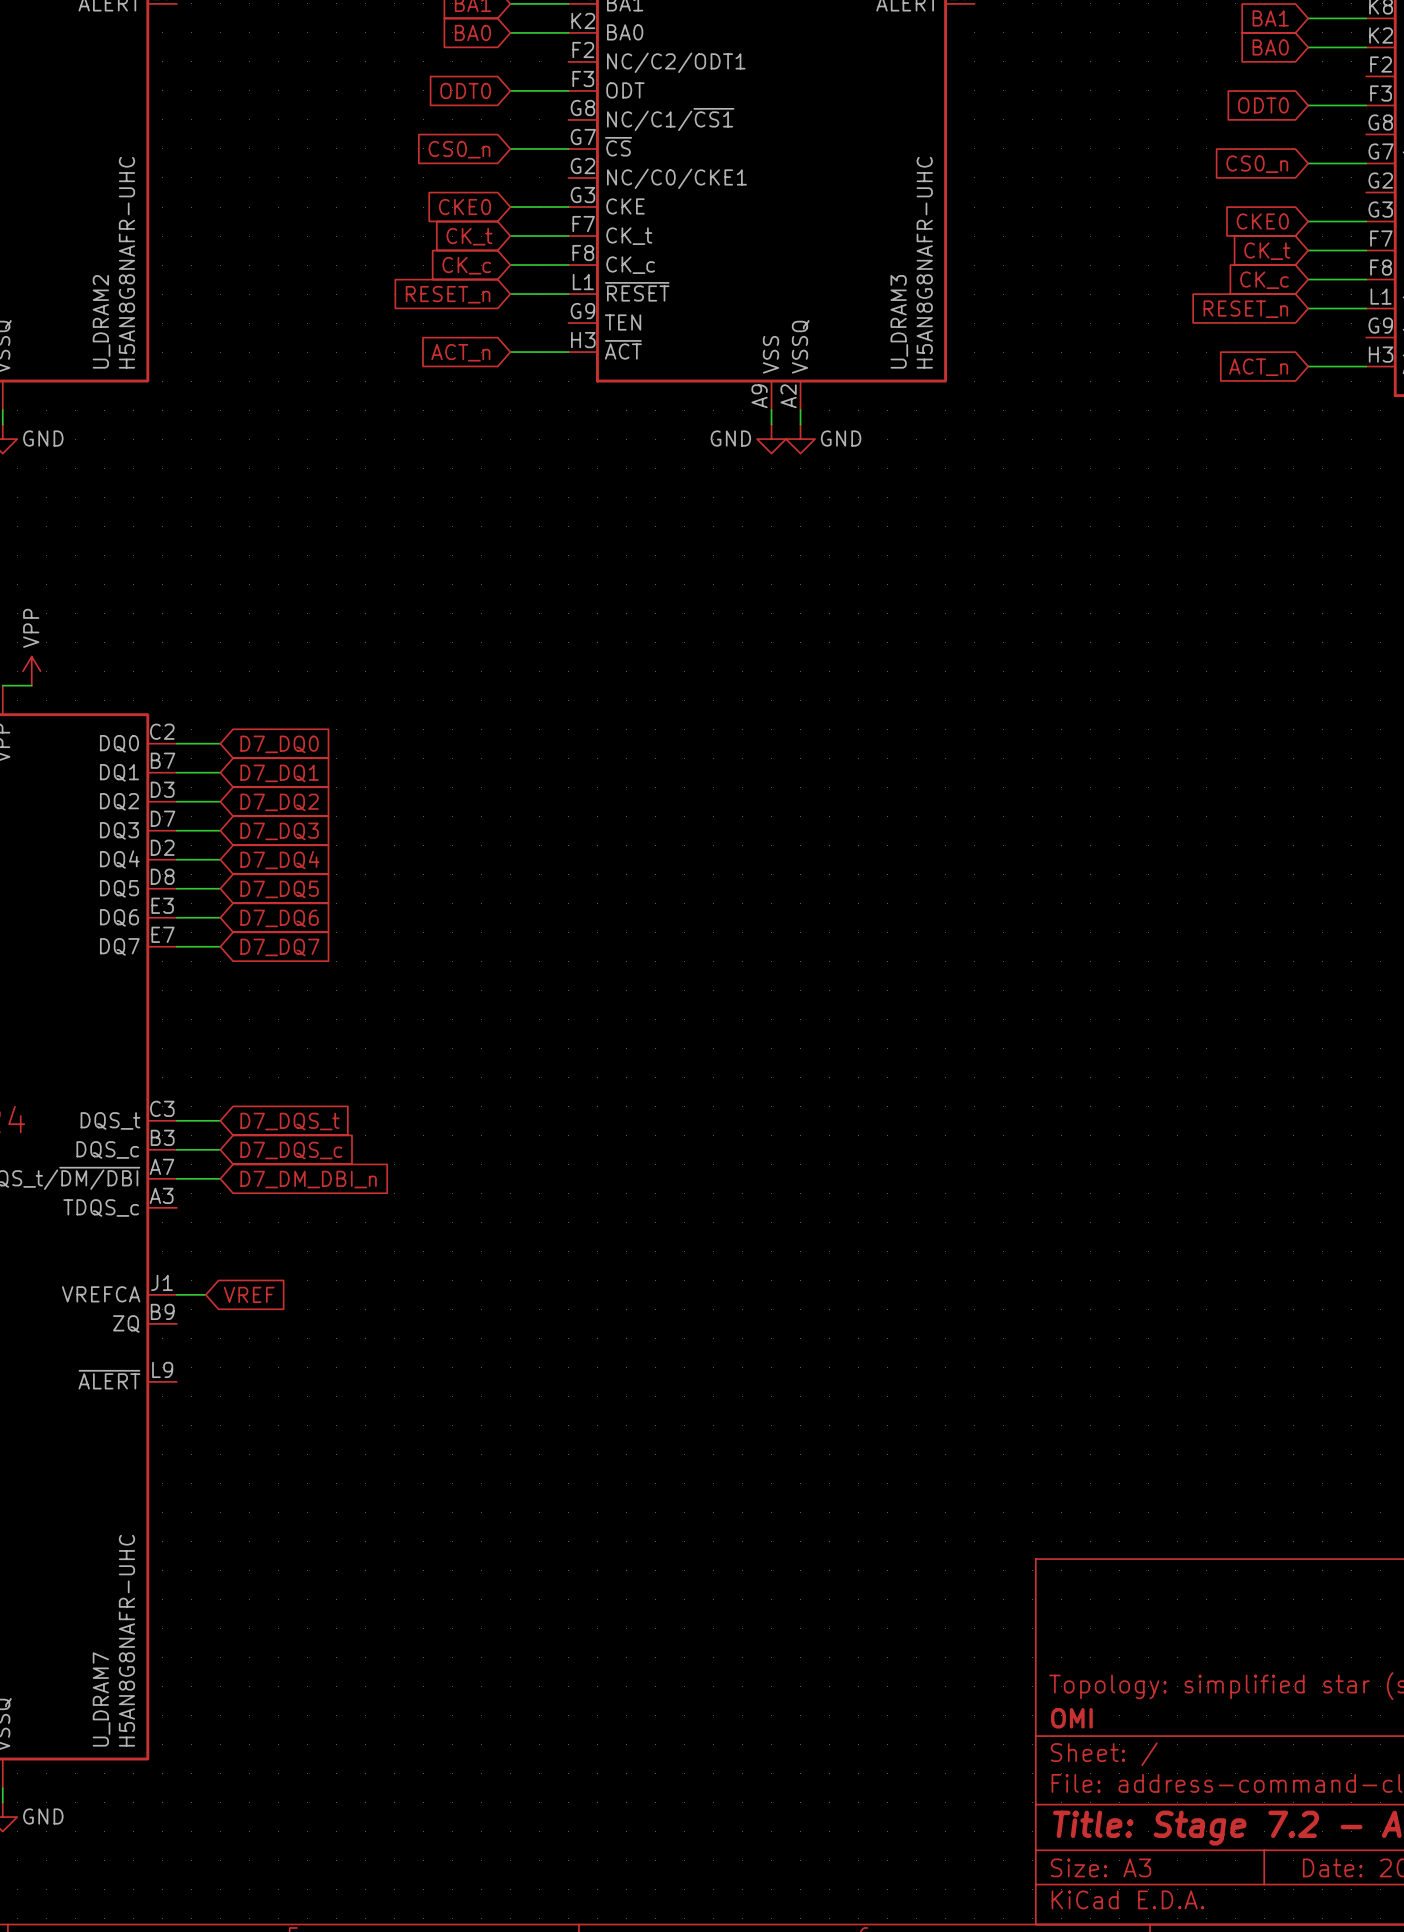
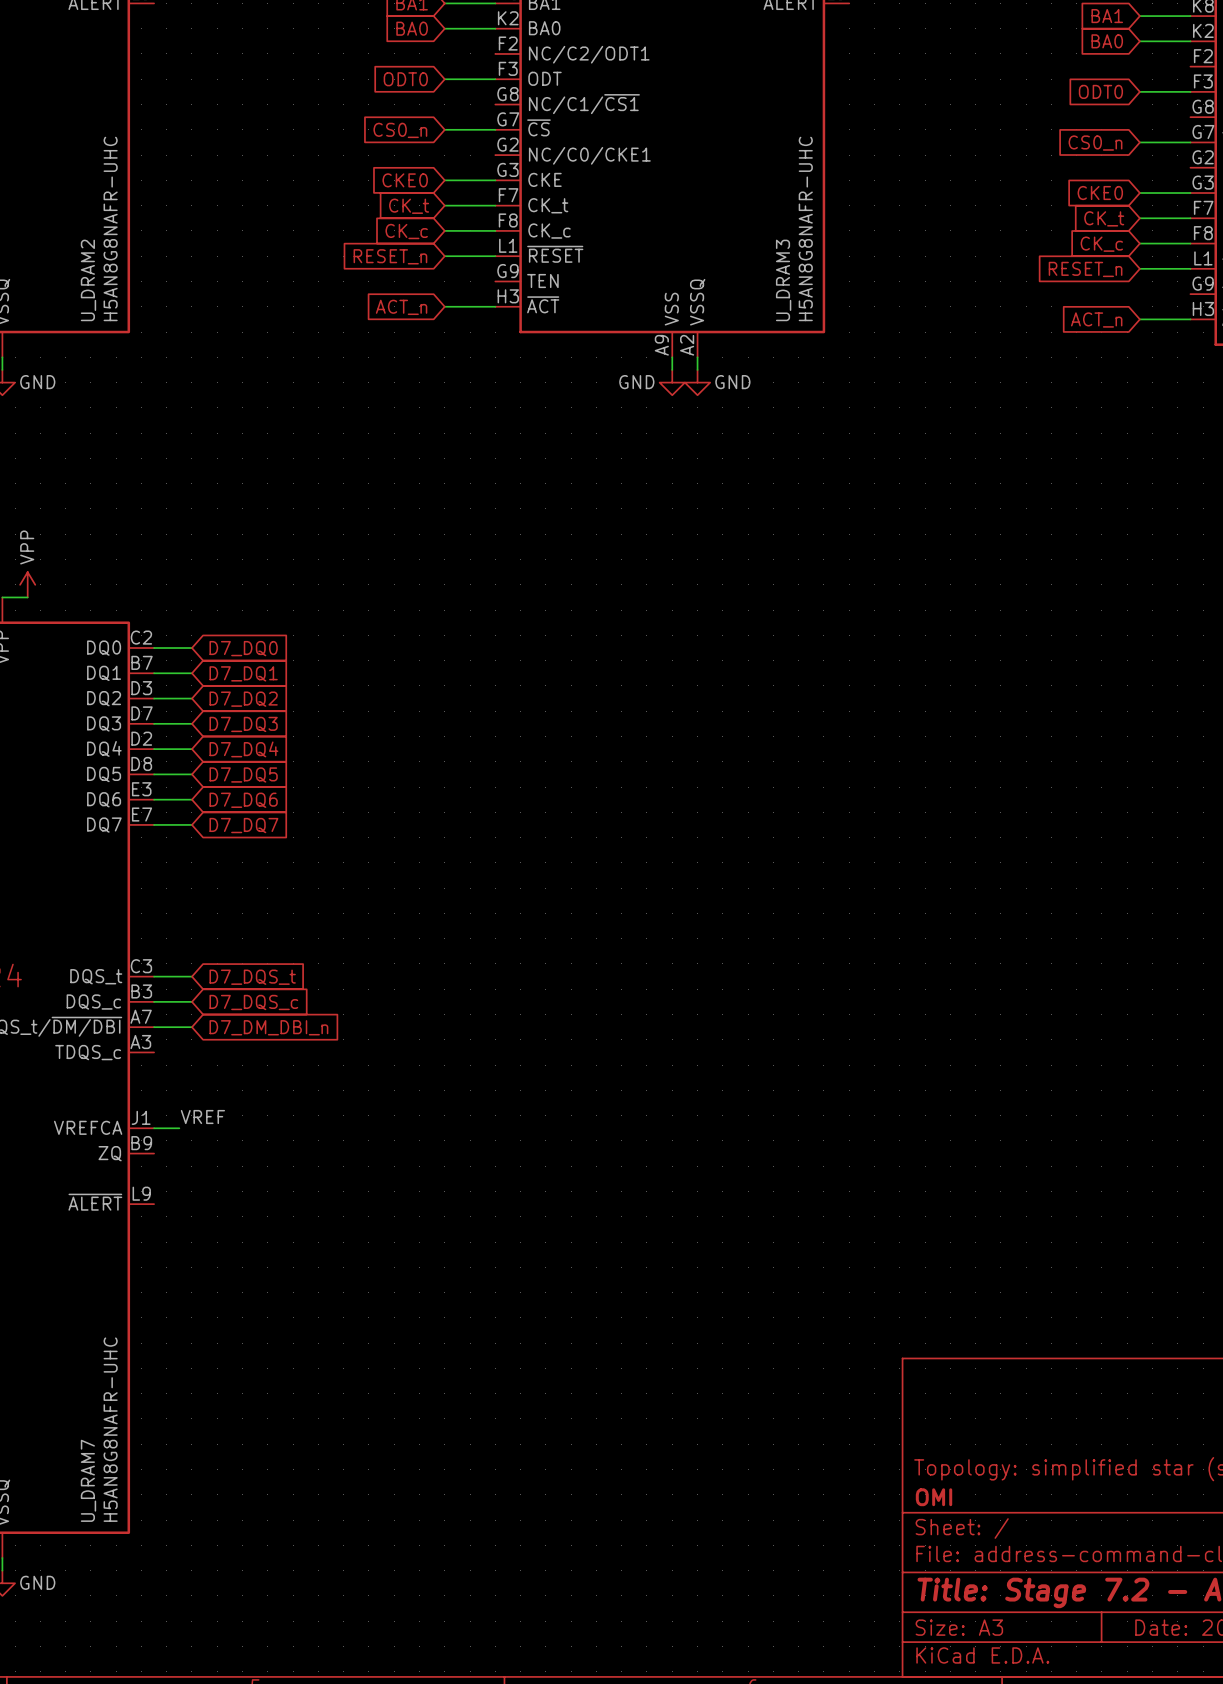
label: none -> VREF (202, 1117)
global label: VREF (249, 1294) -> none

